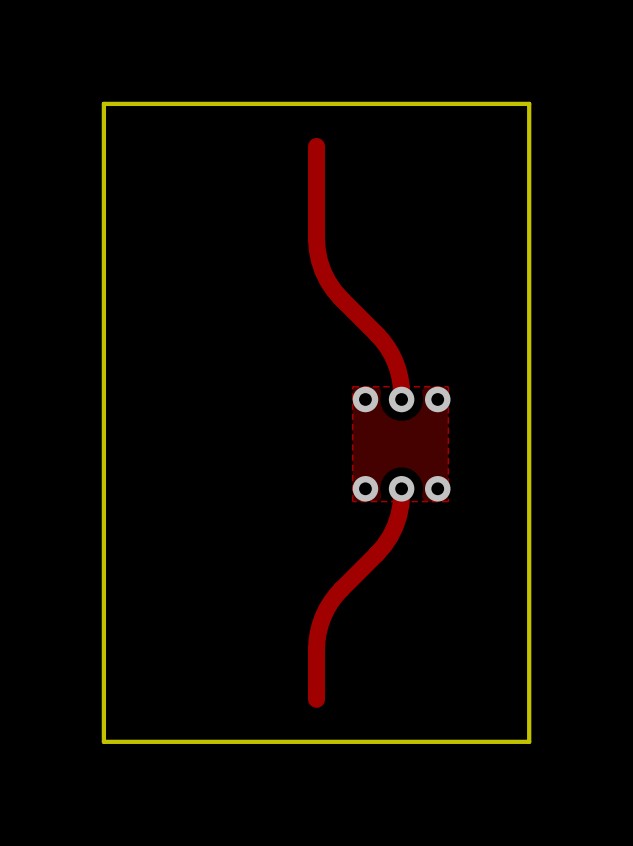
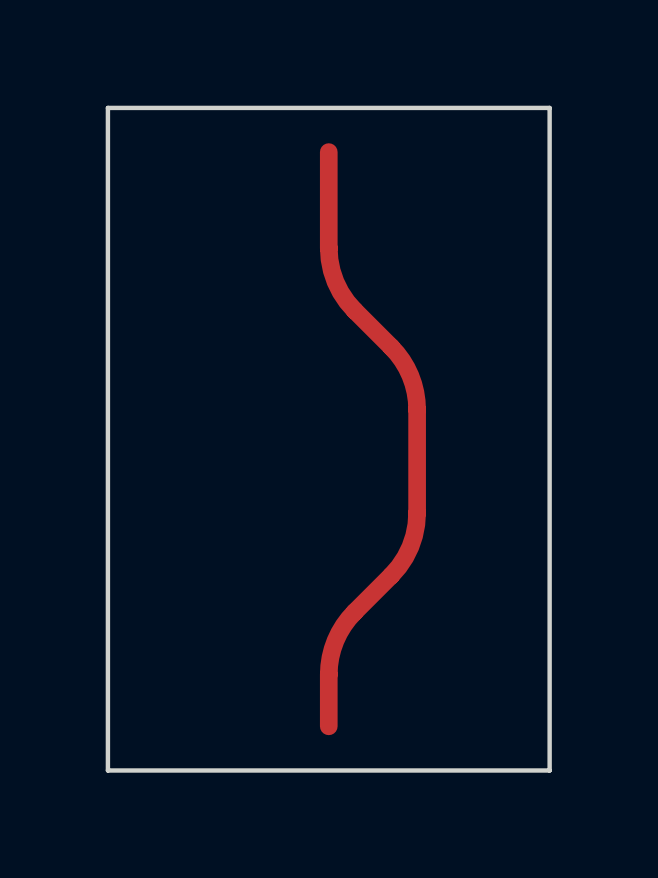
zone outline: (352, 386) (448, 386) (448, 501) (352, 501) (352, 386) -> none
via: (365, 399) -> none
track: none -> (417, 414) (417, 507)
via: (401, 399) -> none
via: (437, 399) -> none
via: (365, 488) -> none
via: (401, 488) -> none
via: (437, 488) -> none

